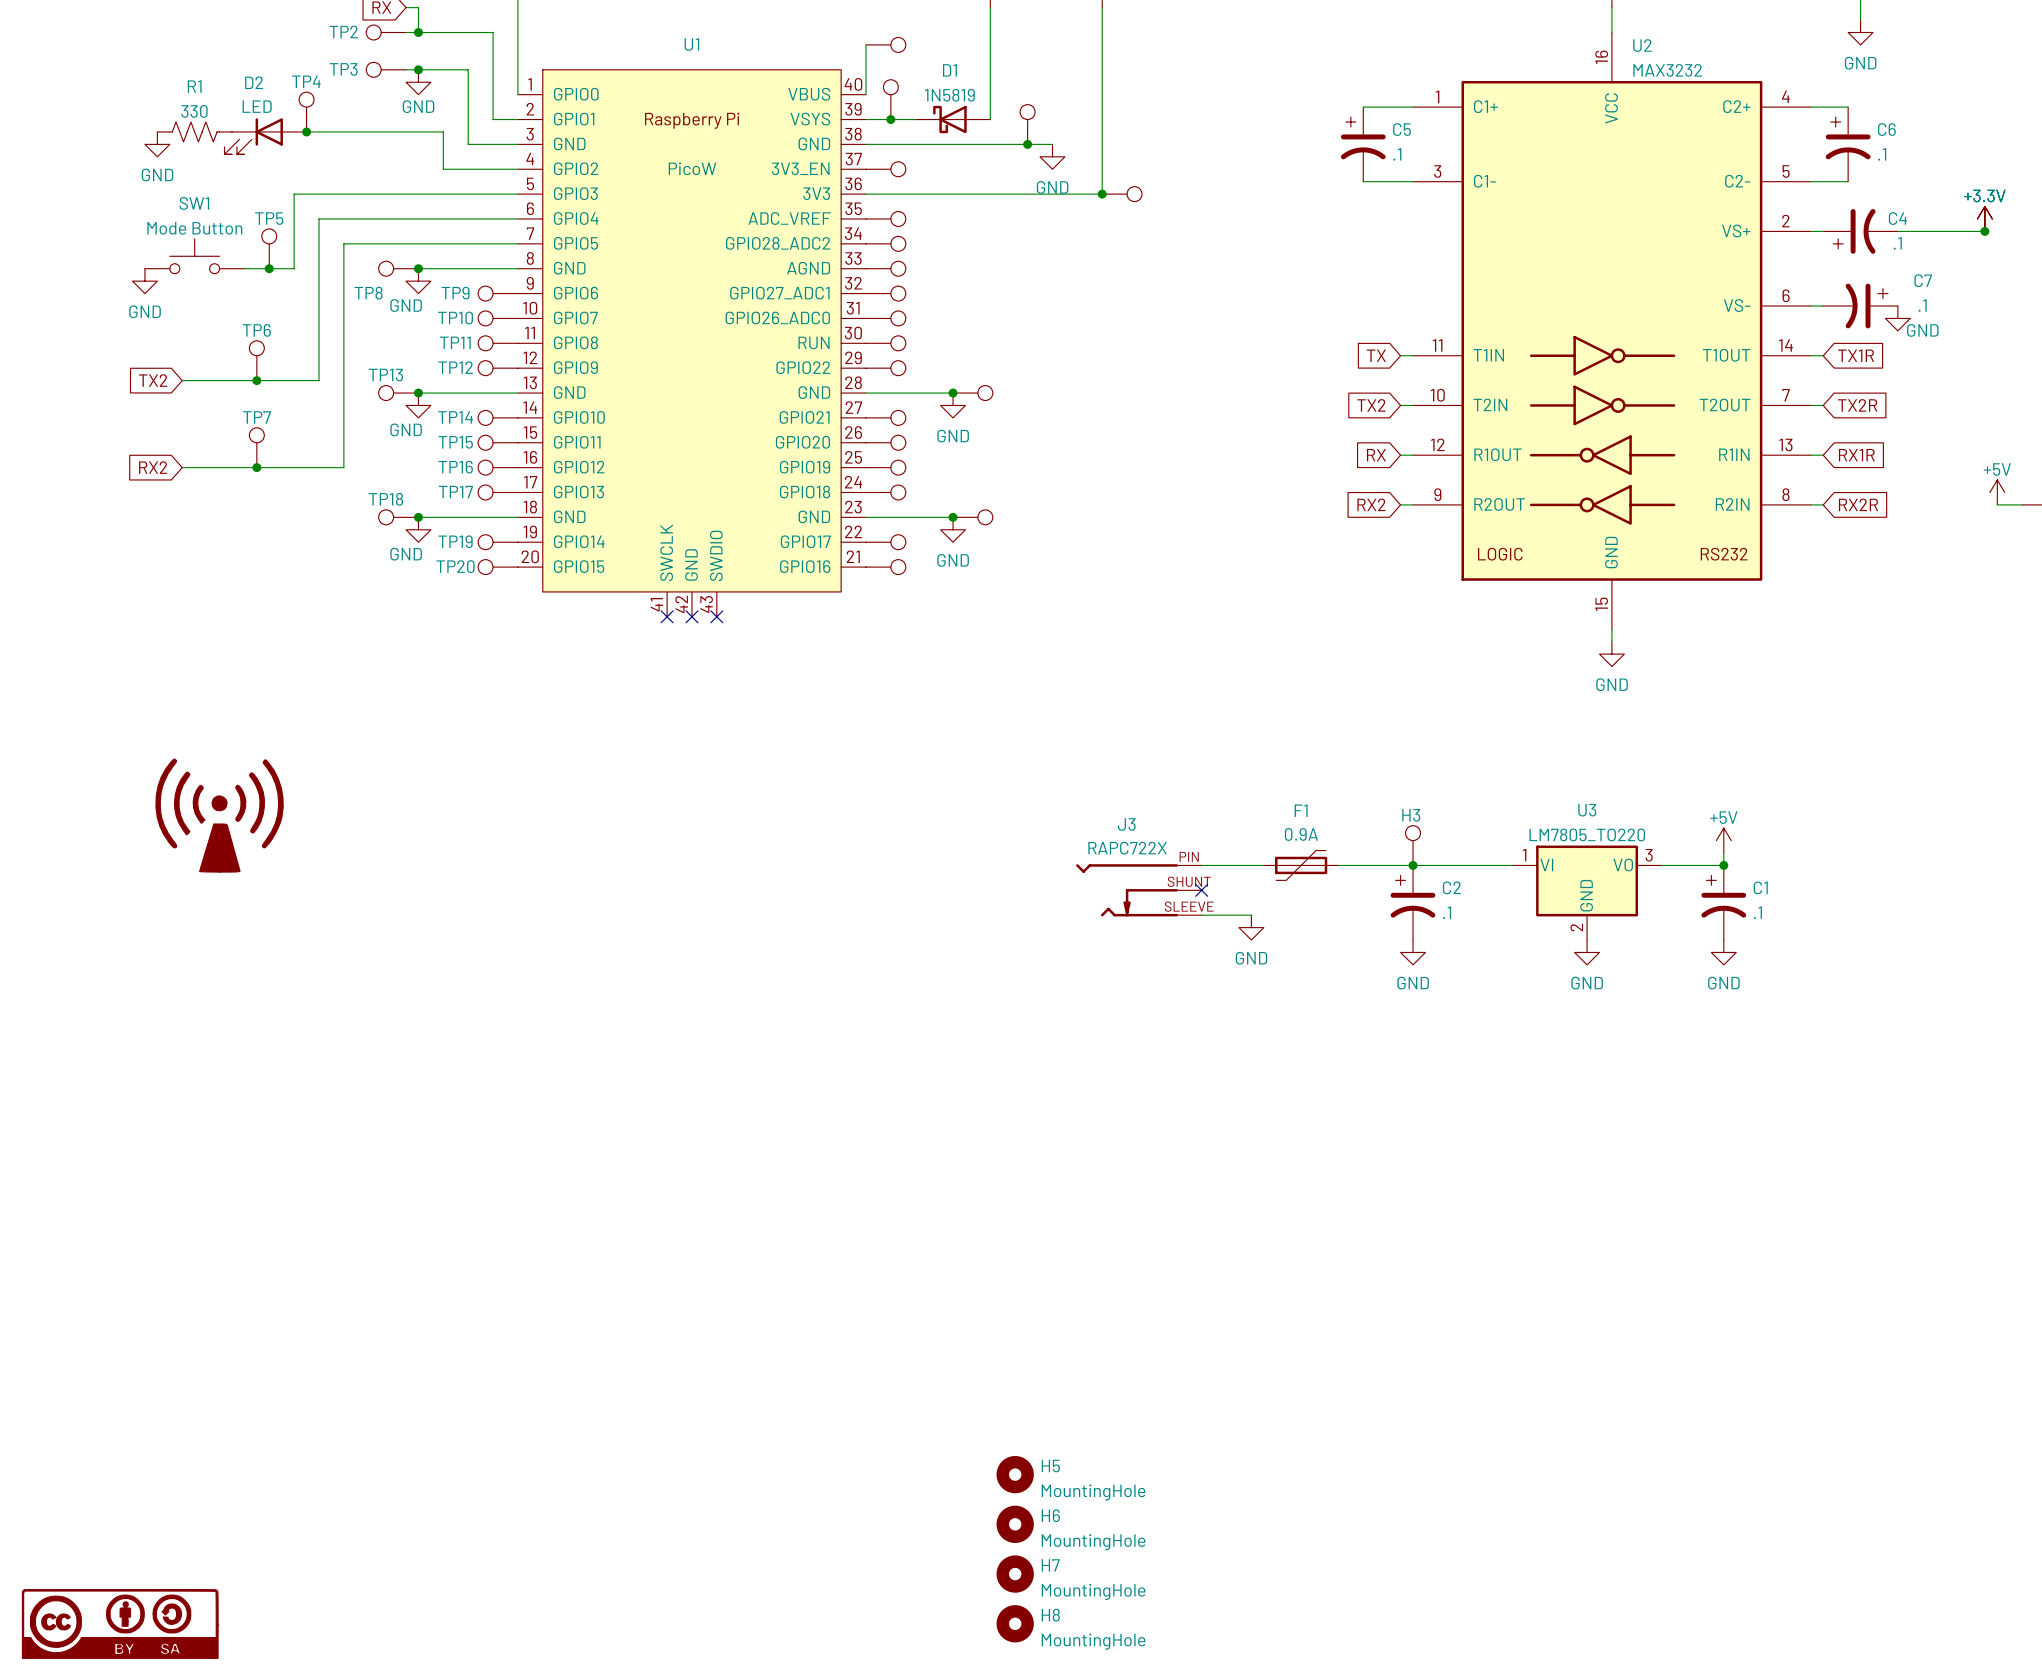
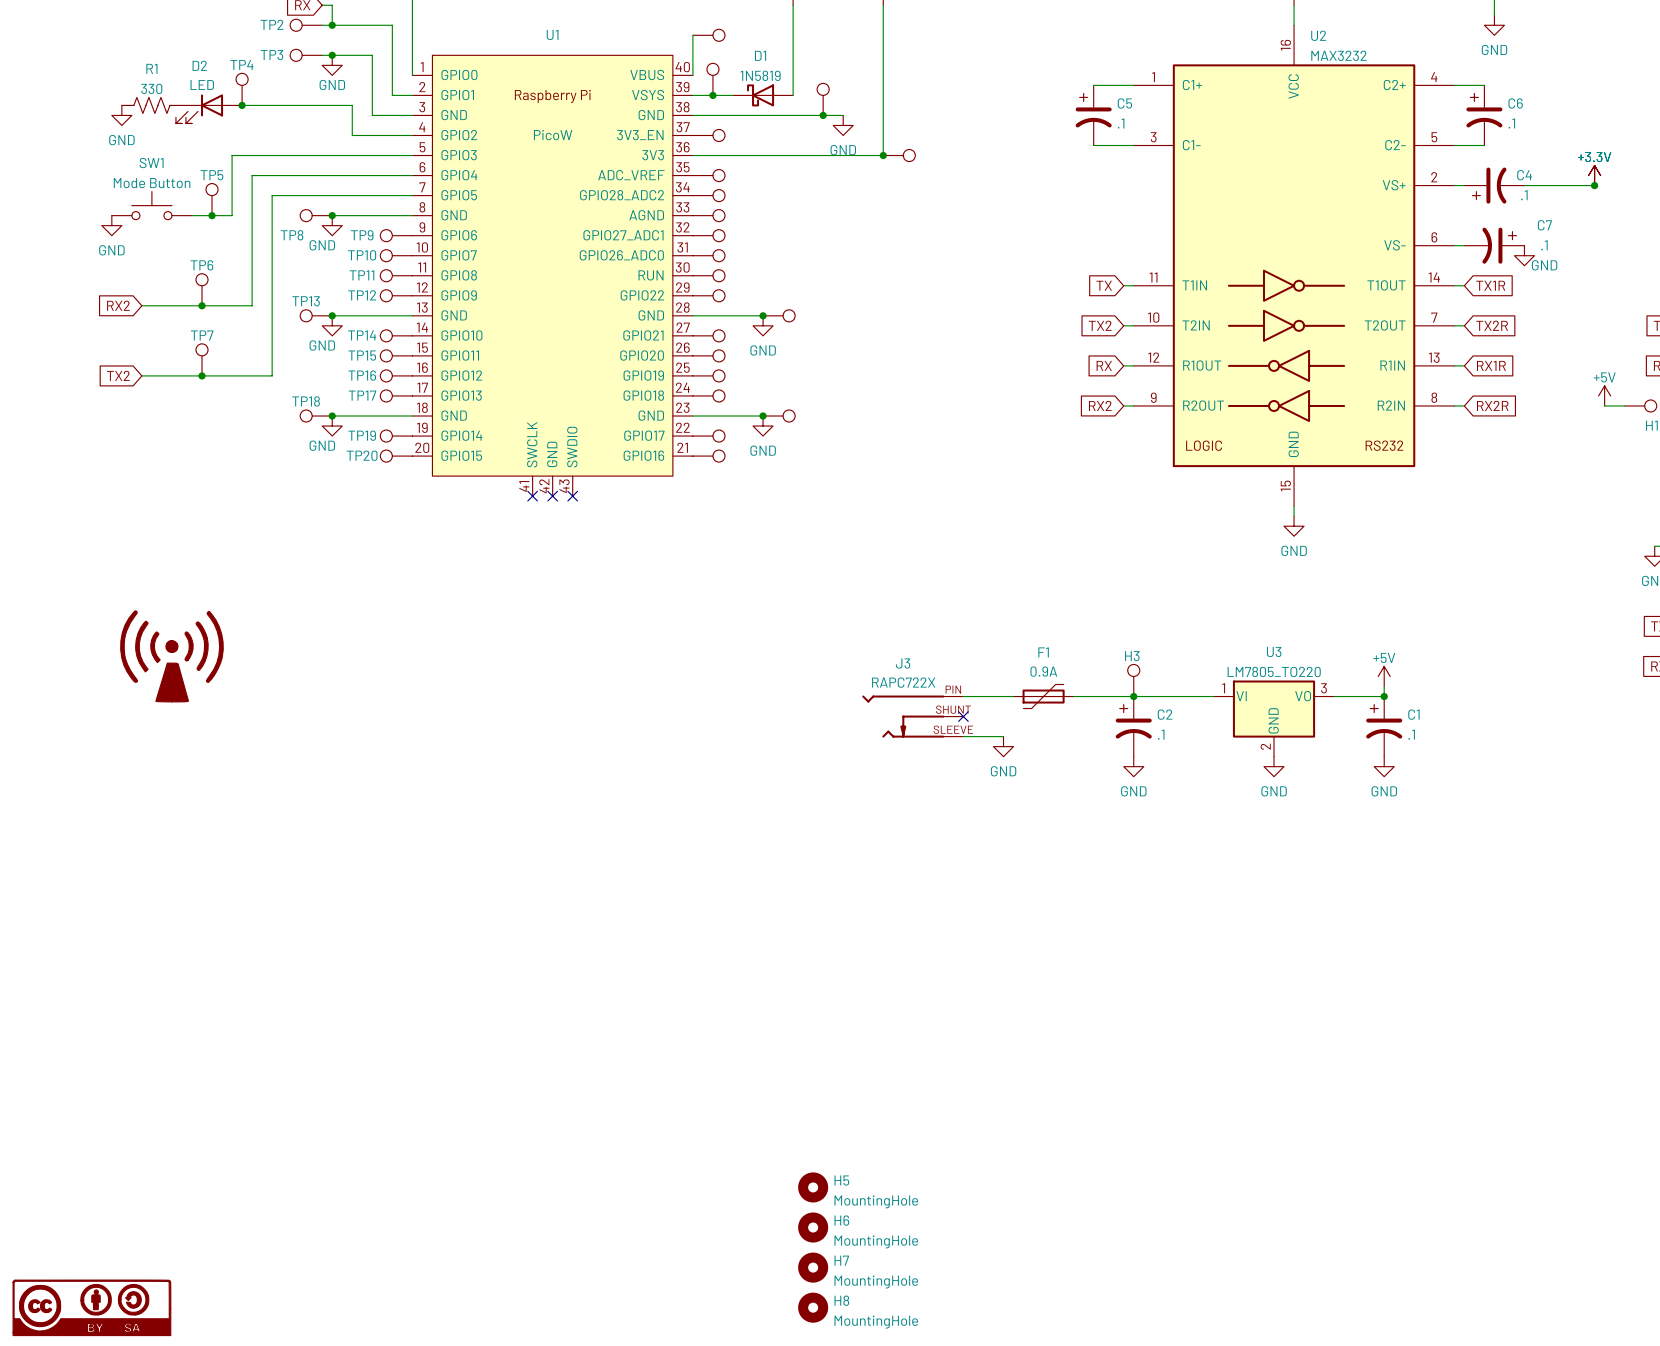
global label: TX2 (153, 380) -> RX2 (118, 305)
global label: RX2 (153, 467) -> TX2 (118, 375)

